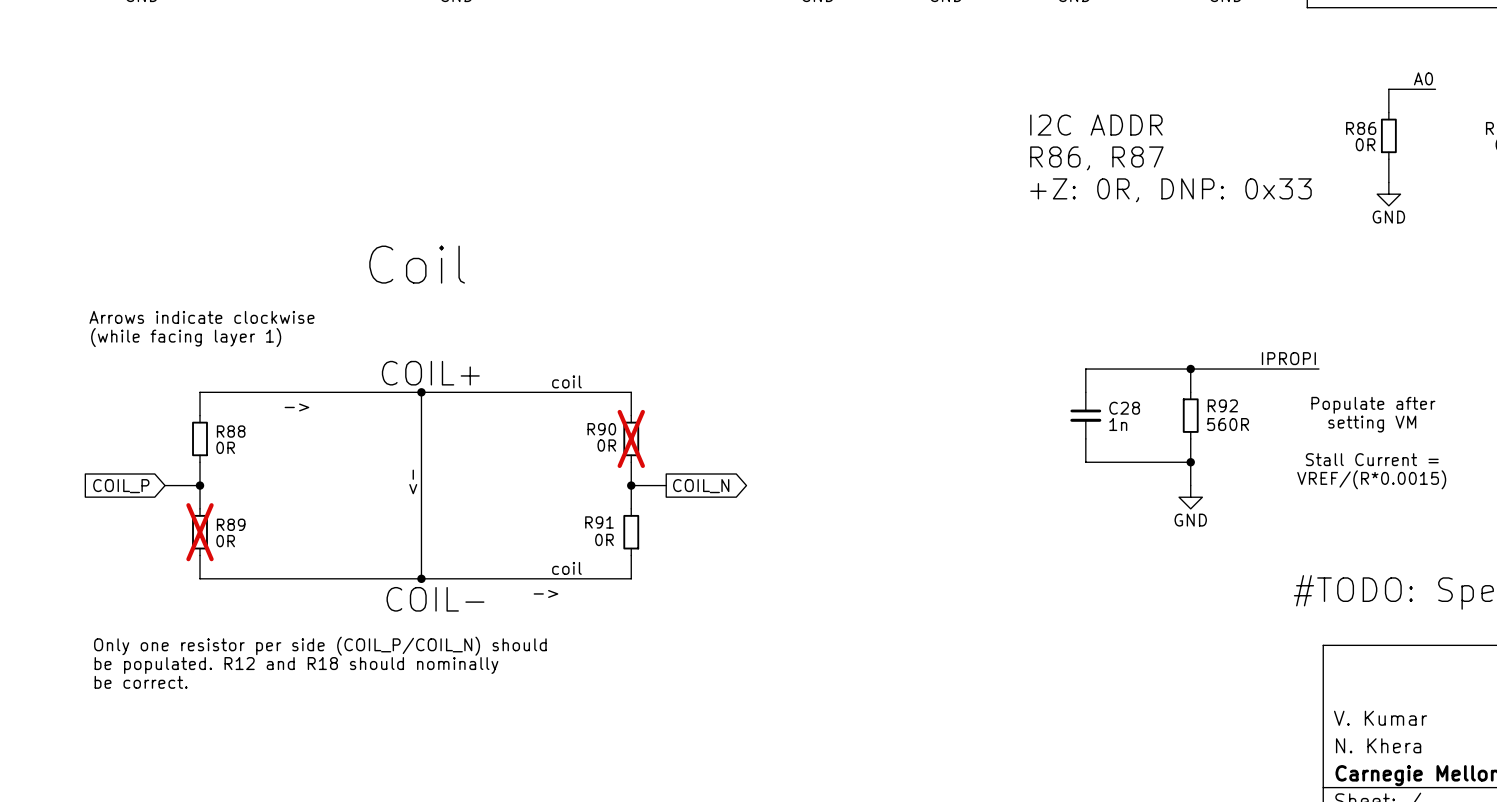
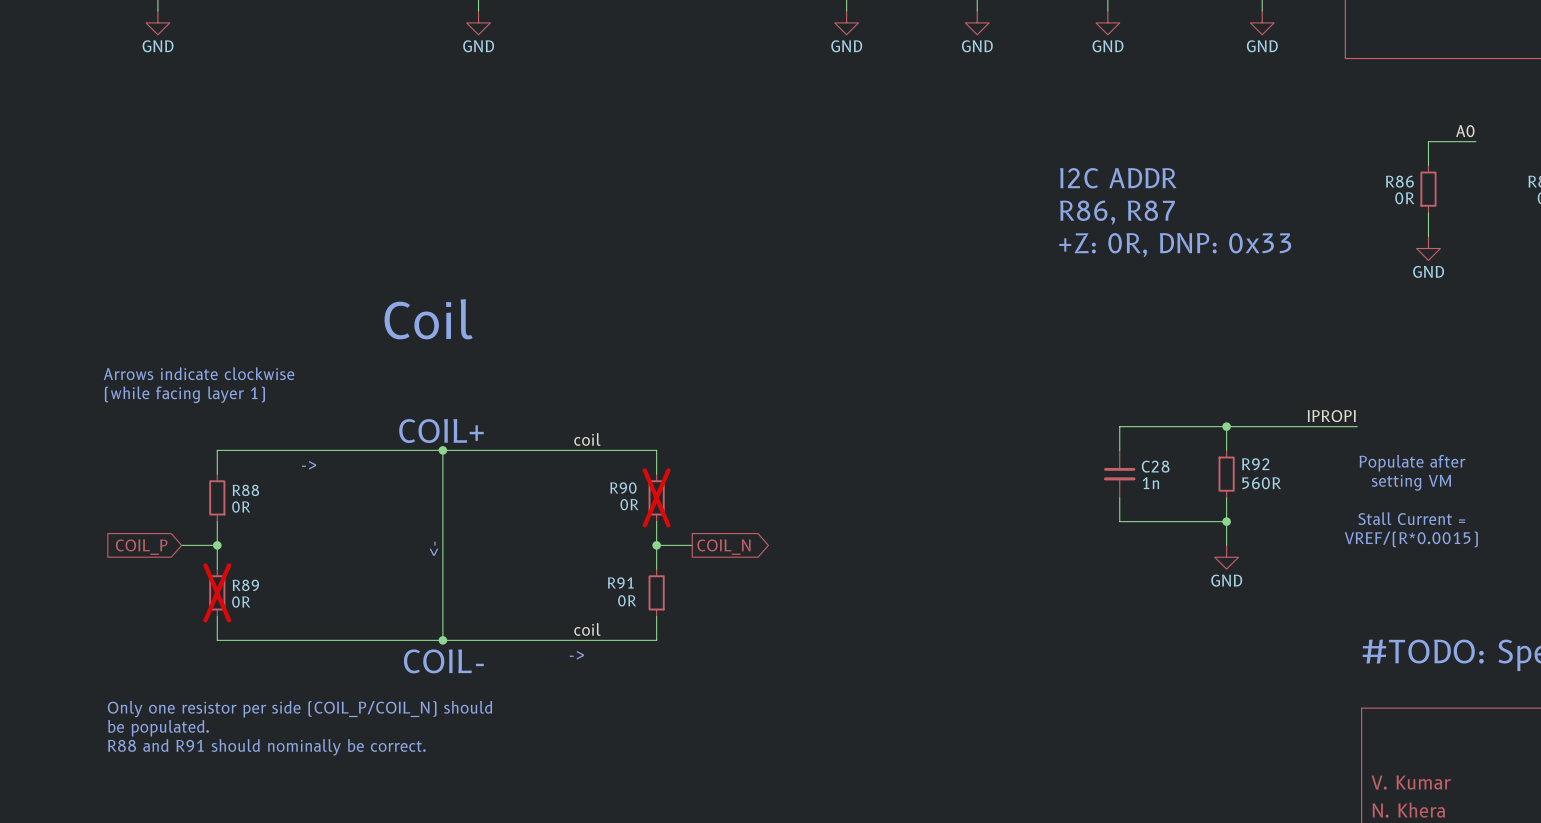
text: be populated. R12 and R18 should nominally (296, 665) -> be populated. (158, 728)
text: be correct. (141, 682) -> R88 and R91 should nominally be correct. (266, 747)

